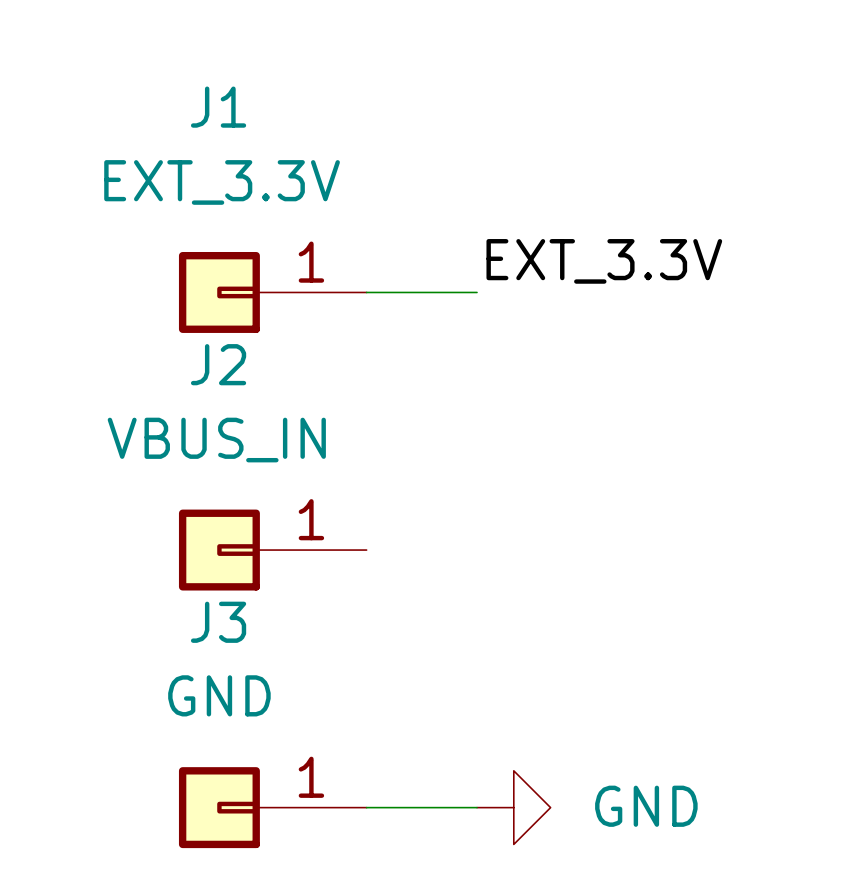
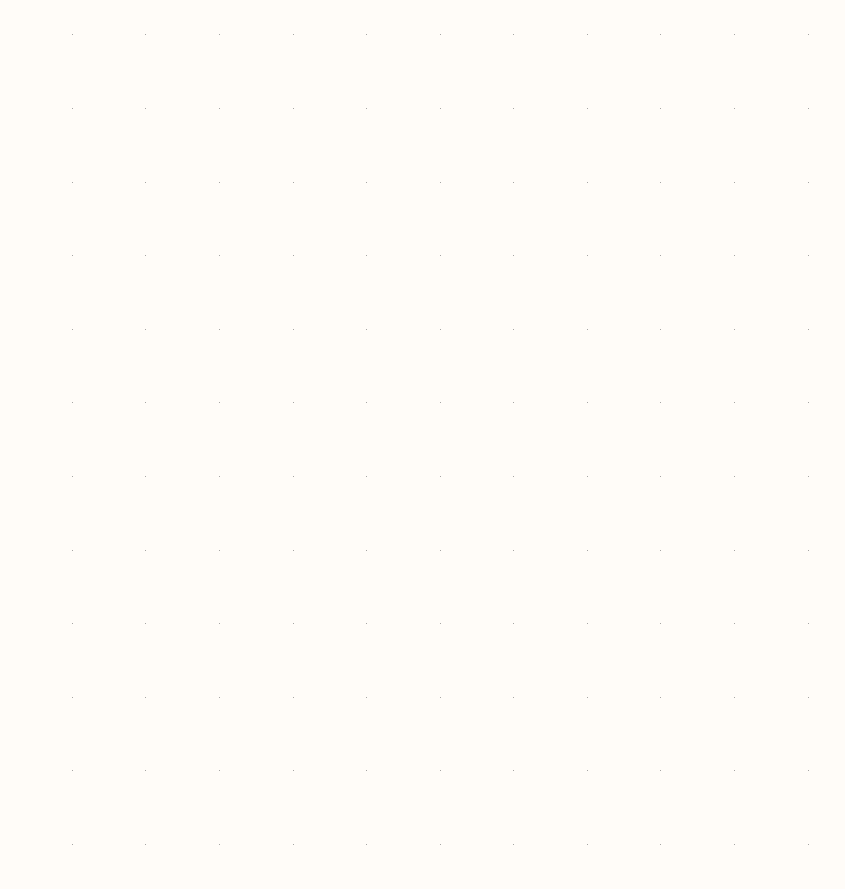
label: EXT_3.3V (604, 261) -> none
J1: EXT_3.3V (272, 292) -> none
wire: (366, 292) (477, 292) -> none
J2: VBUS_IN (272, 550) -> none
J3: GND (272, 807) -> none
wire: (366, 807) (477, 807) -> none
power symbol: GND (513, 807) -> none

